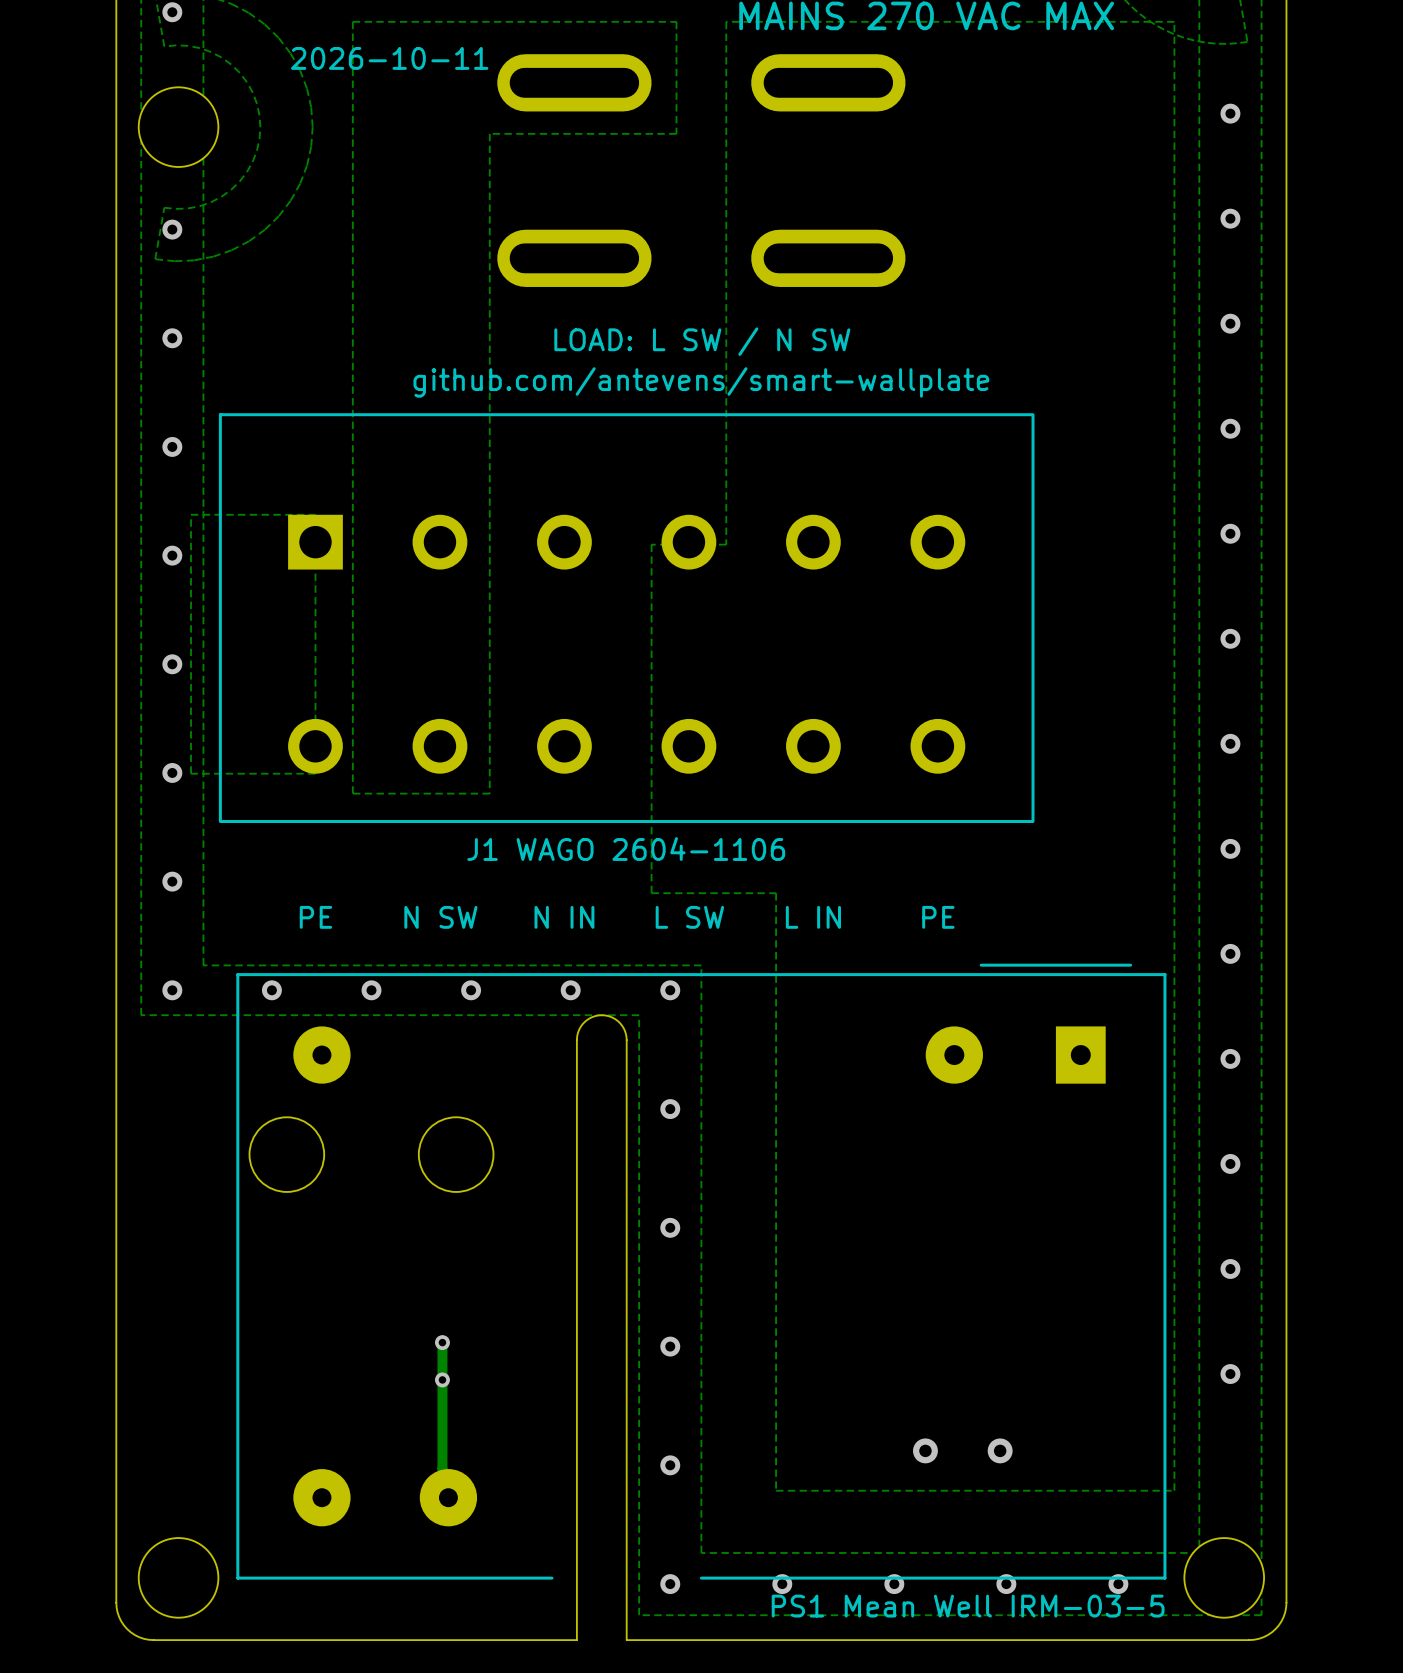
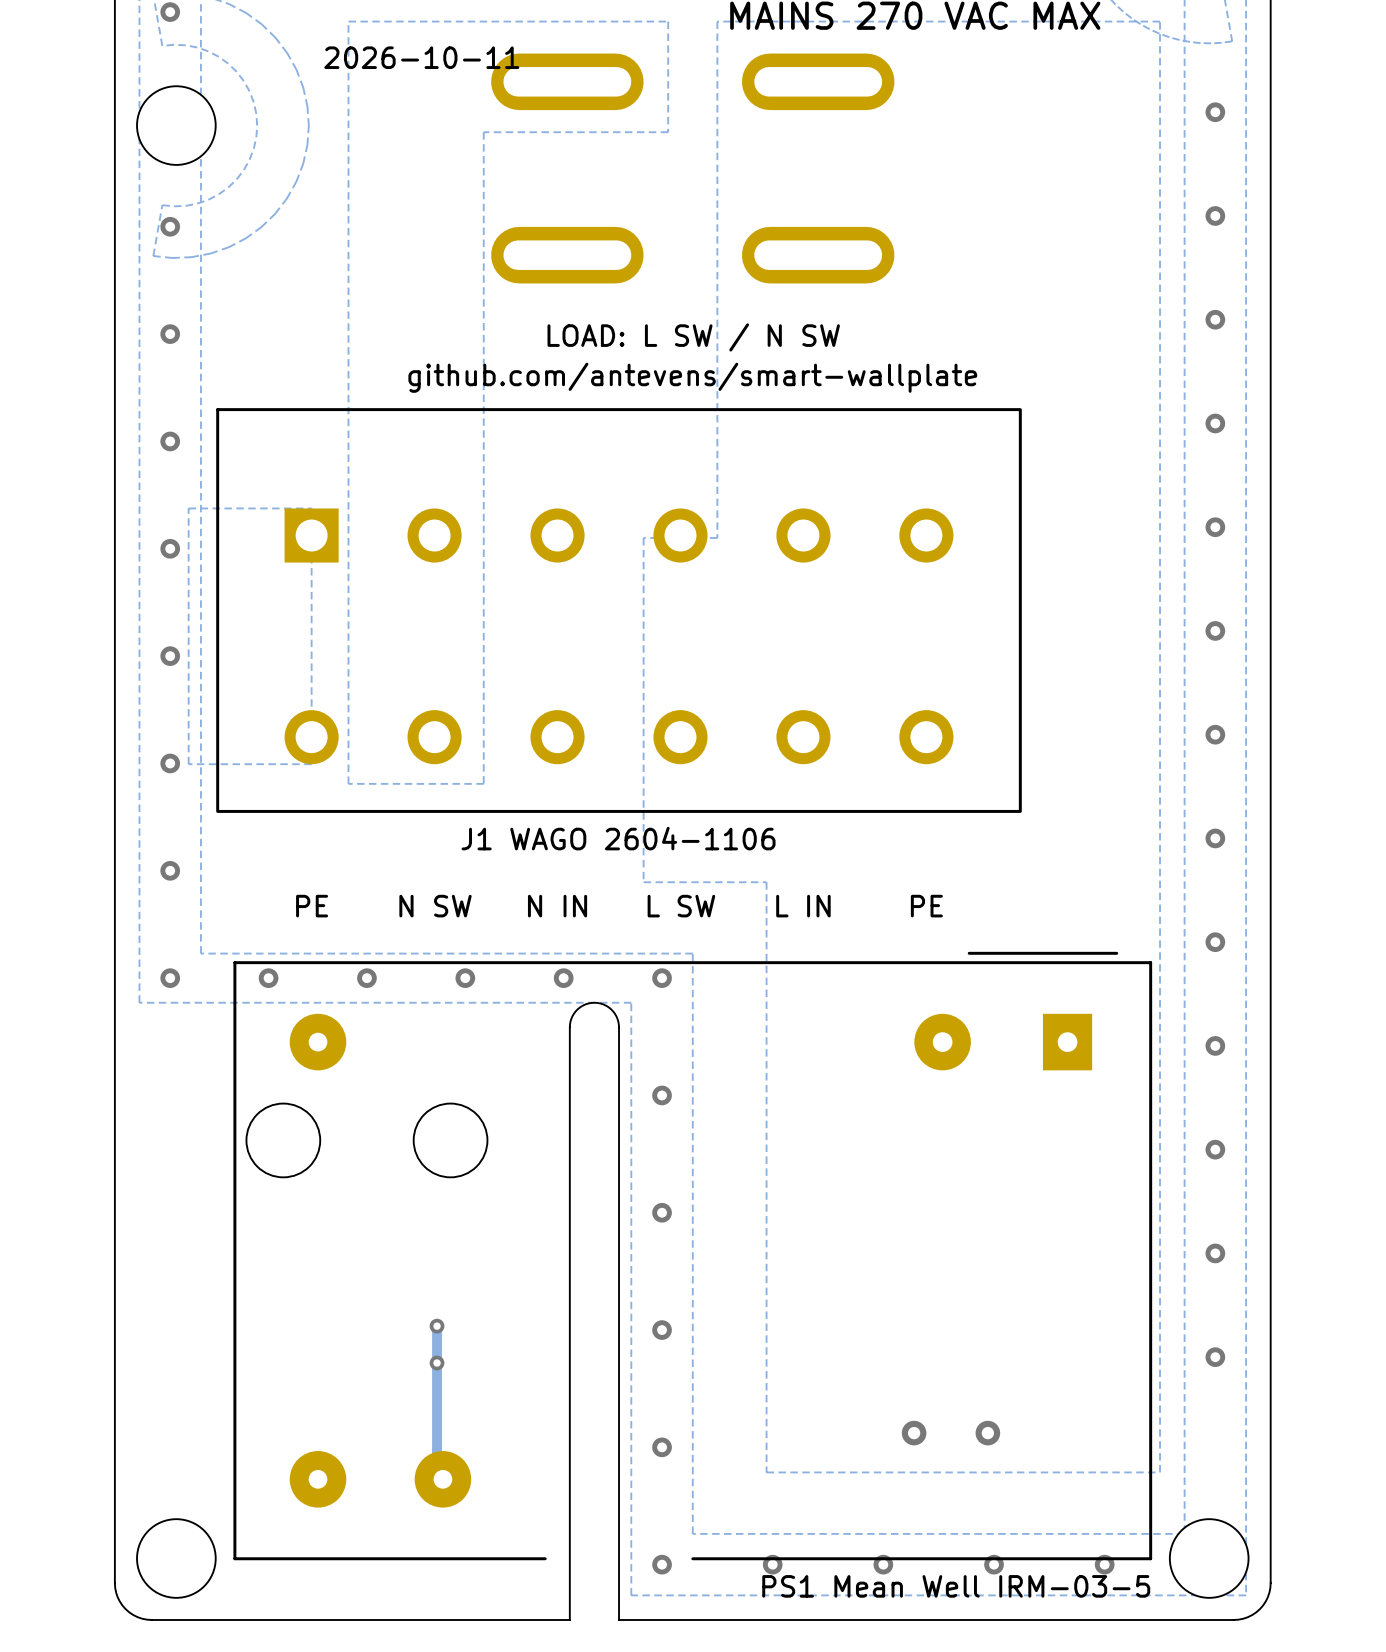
text position: 2026-10-11 (389, 58) -> 2026-10-11 (421, 57)

